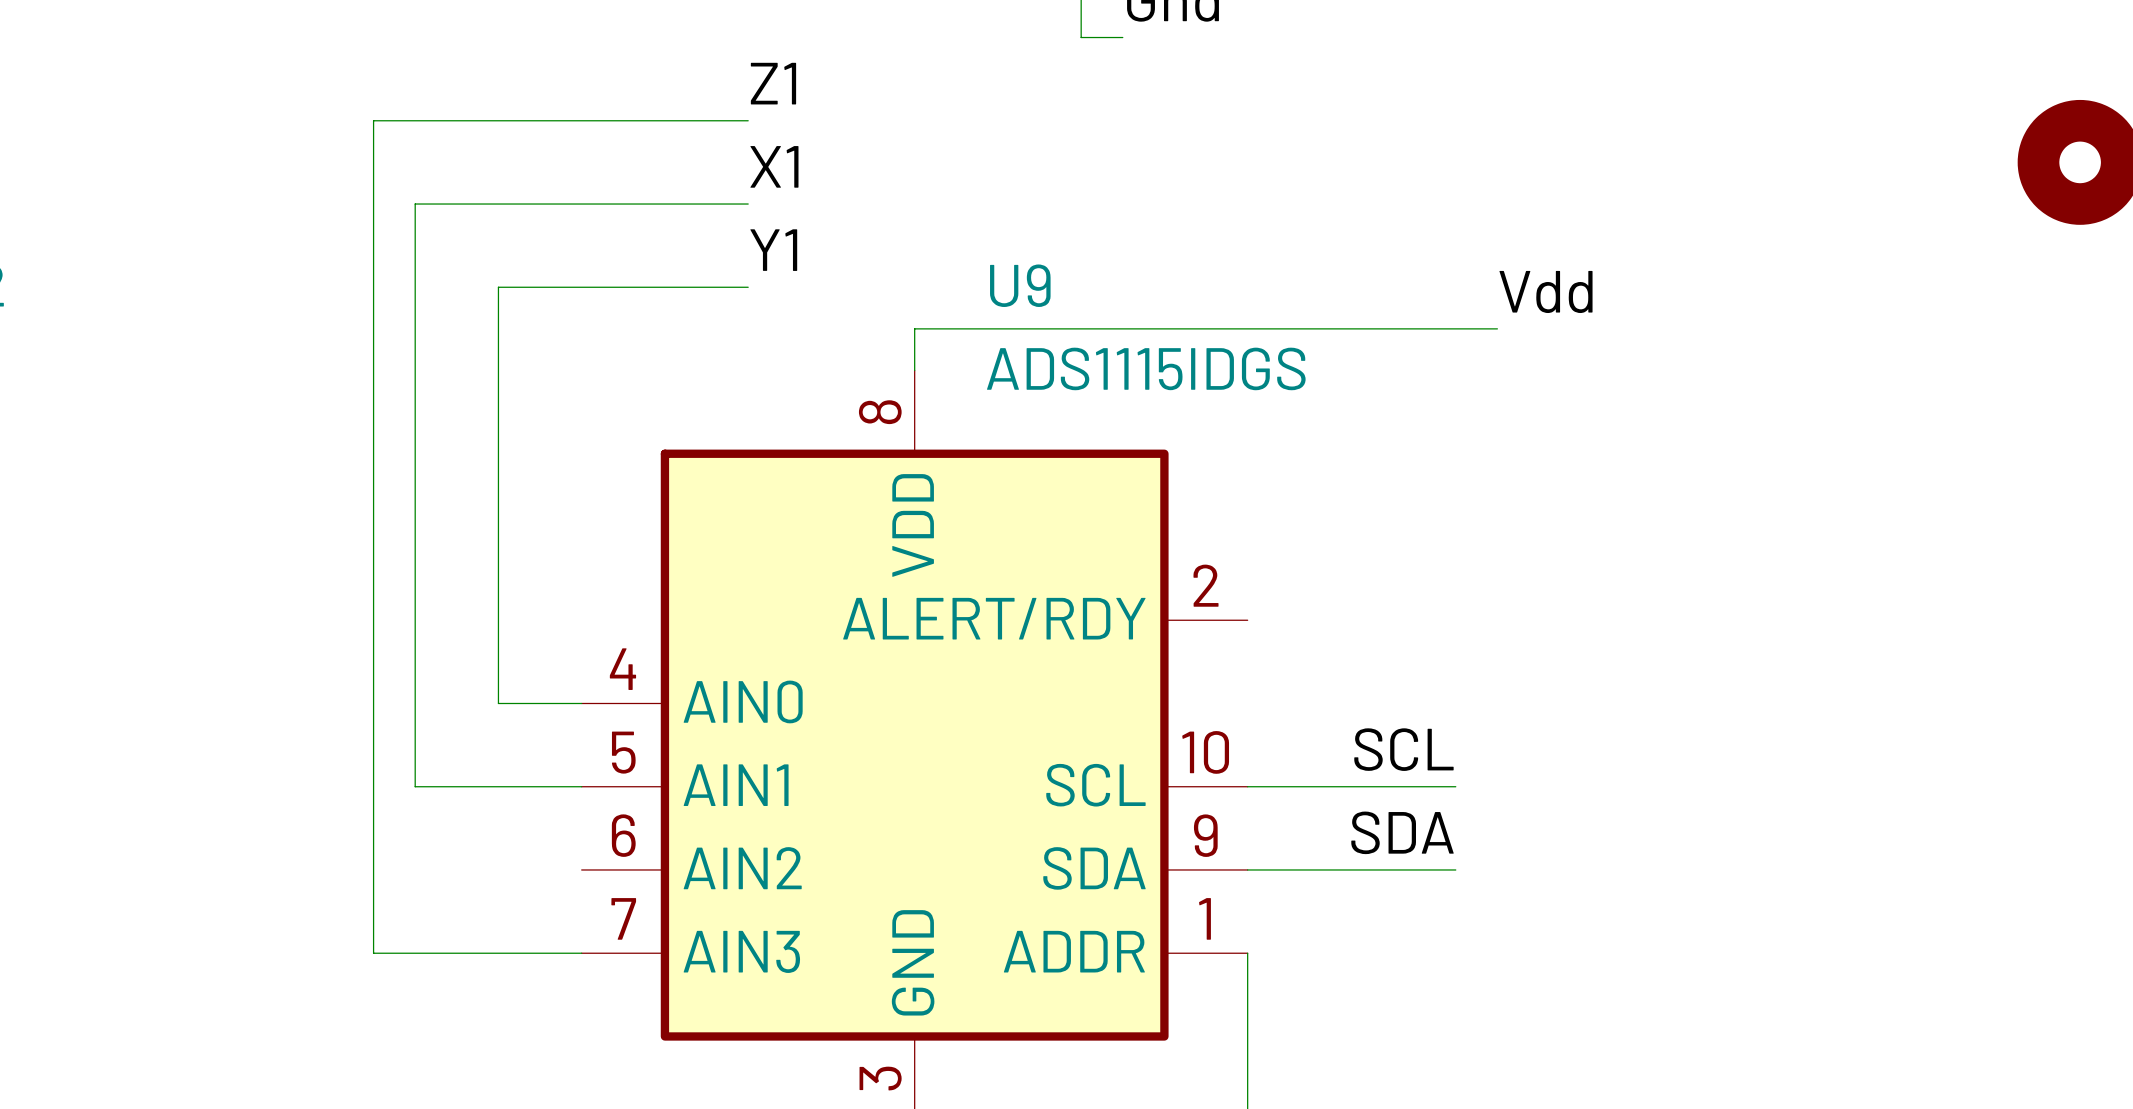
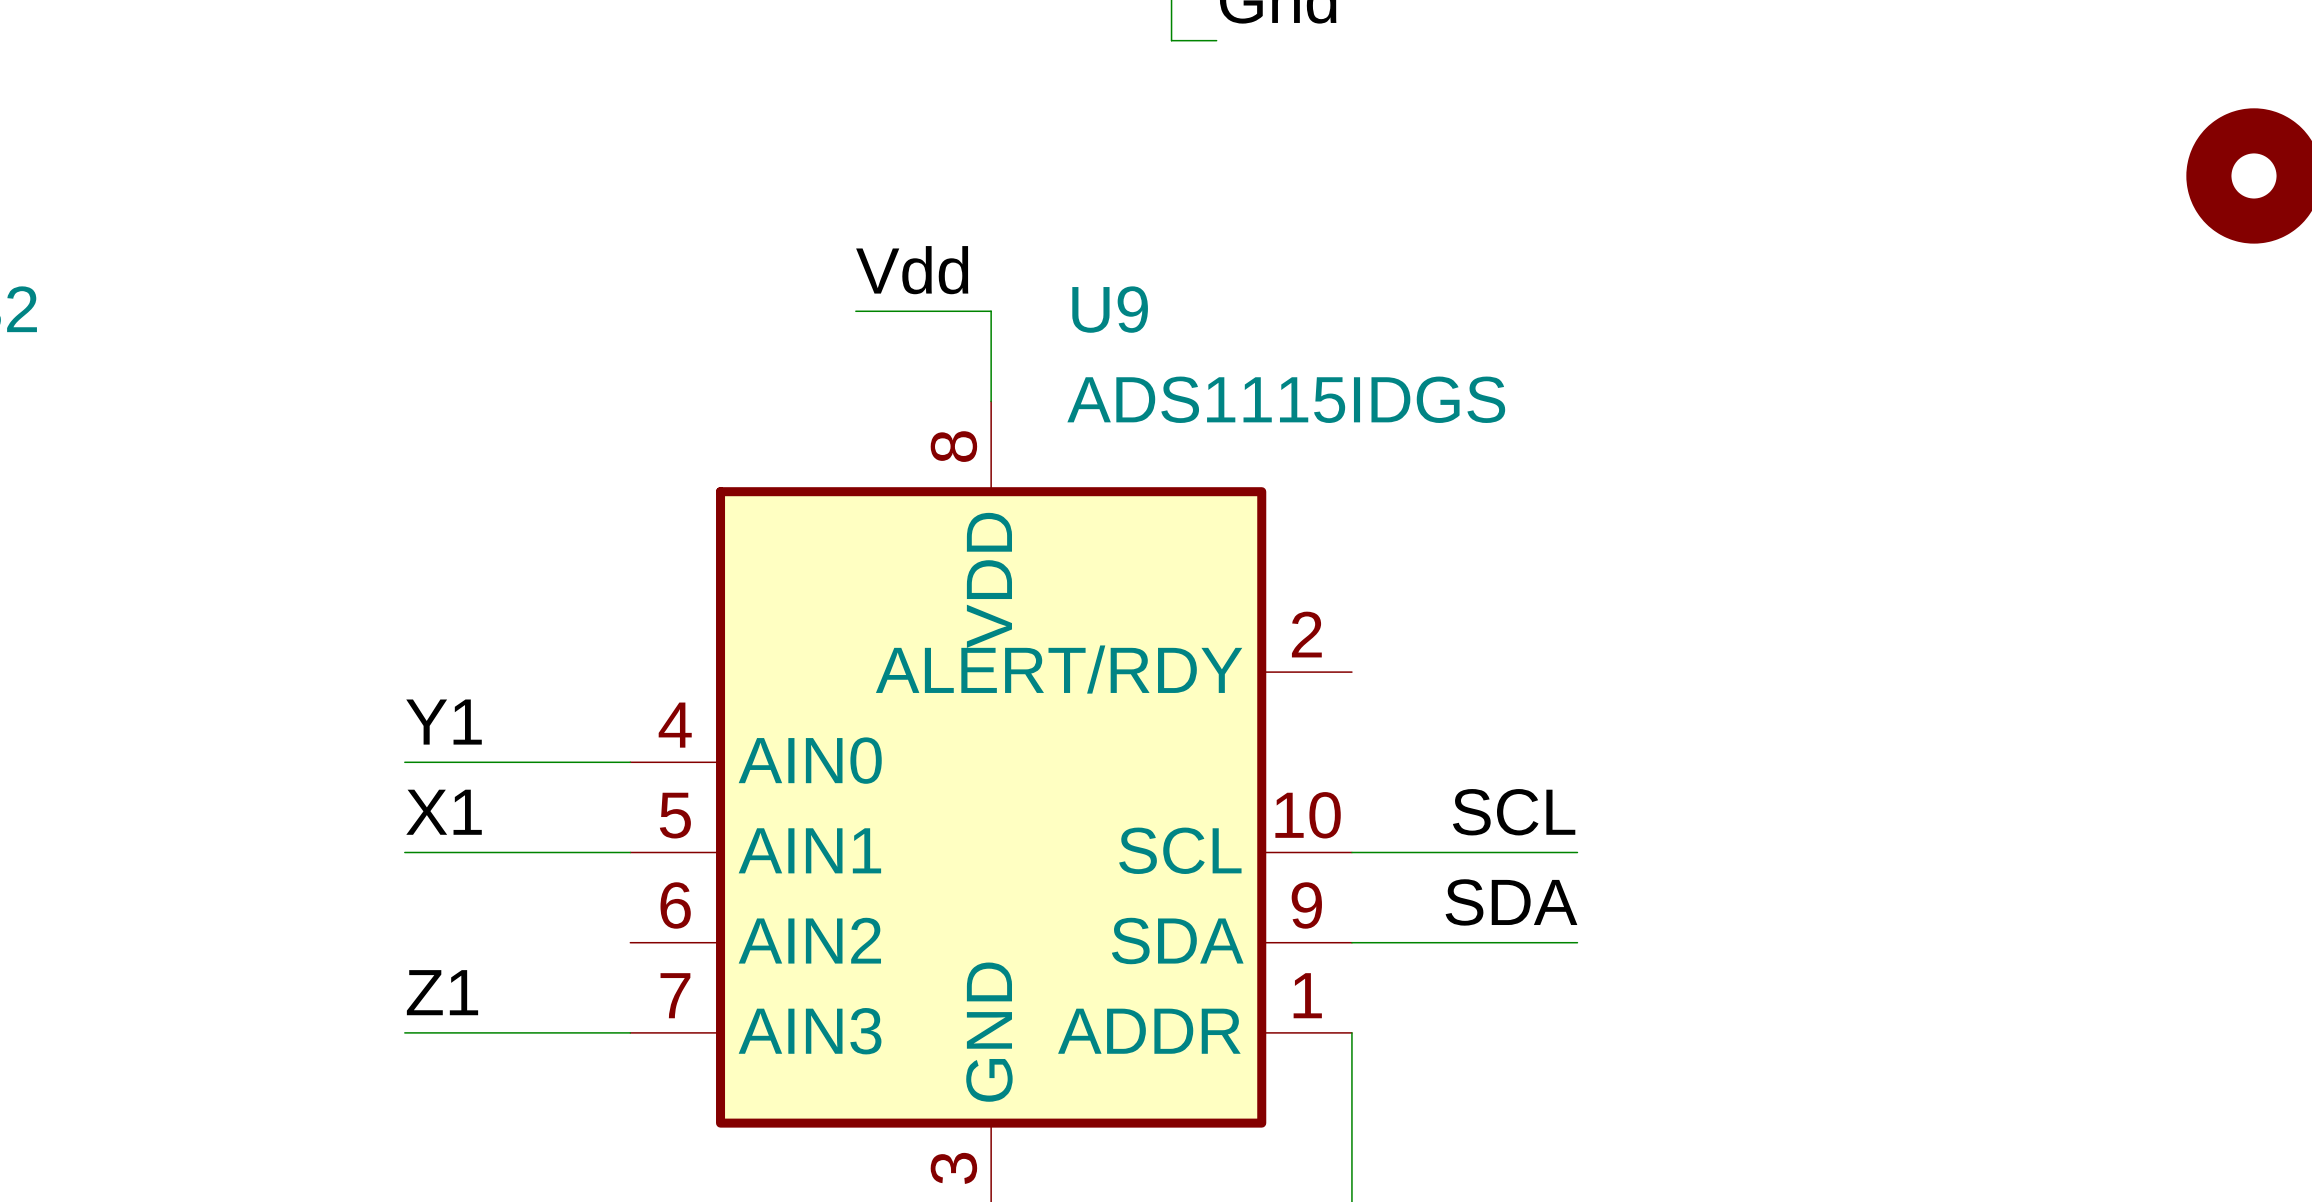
label: Z1 (773, 83) -> none
wire: (748, 120) (373, 120) (373, 953) -> none
label position: X1 (774, 166) -> X1 (444, 812)
wire: (748, 204) (415, 204) (415, 786) -> (404, 852) (449, 852)
label position: Y1 (773, 250) -> Y1 (444, 722)
wire: (748, 287) (498, 287) (498, 703) -> (404, 762) (540, 762)
label position: Vdd (1546, 291) -> Vdd (912, 270)
wire: (914, 328) (1497, 328) -> (991, 356) (991, 311) (855, 311)
label: none -> Z1 (442, 992)

